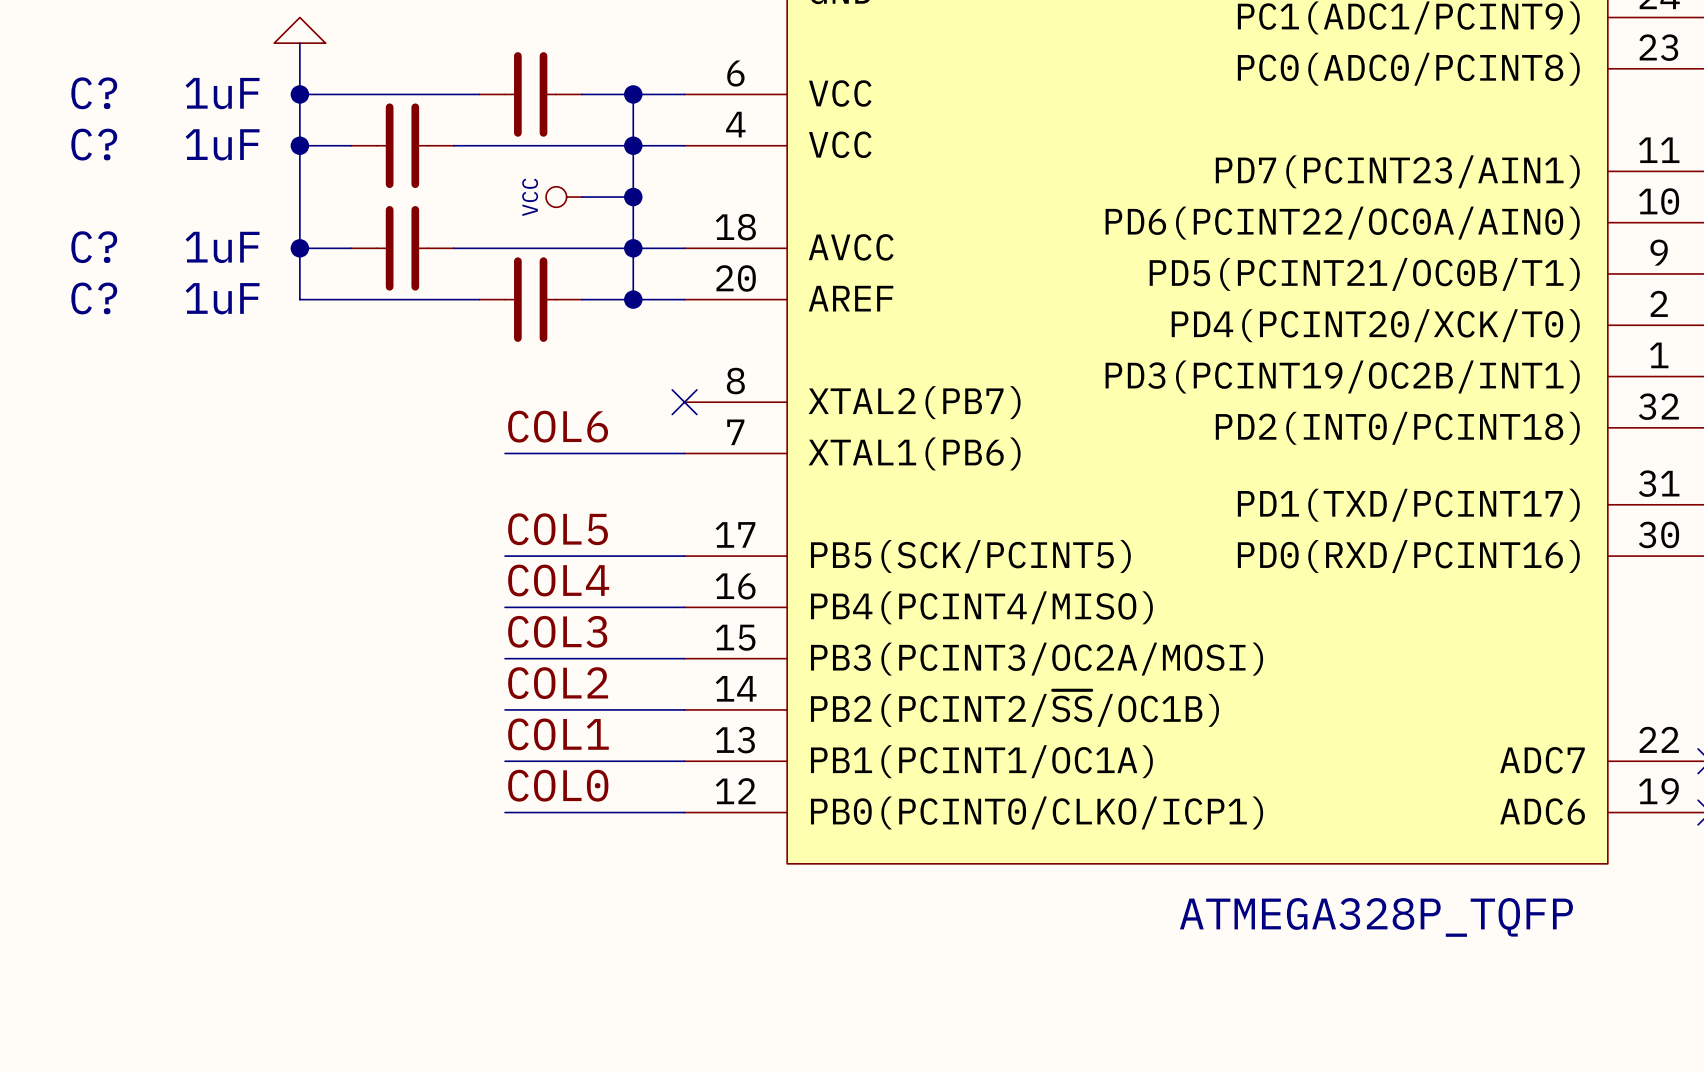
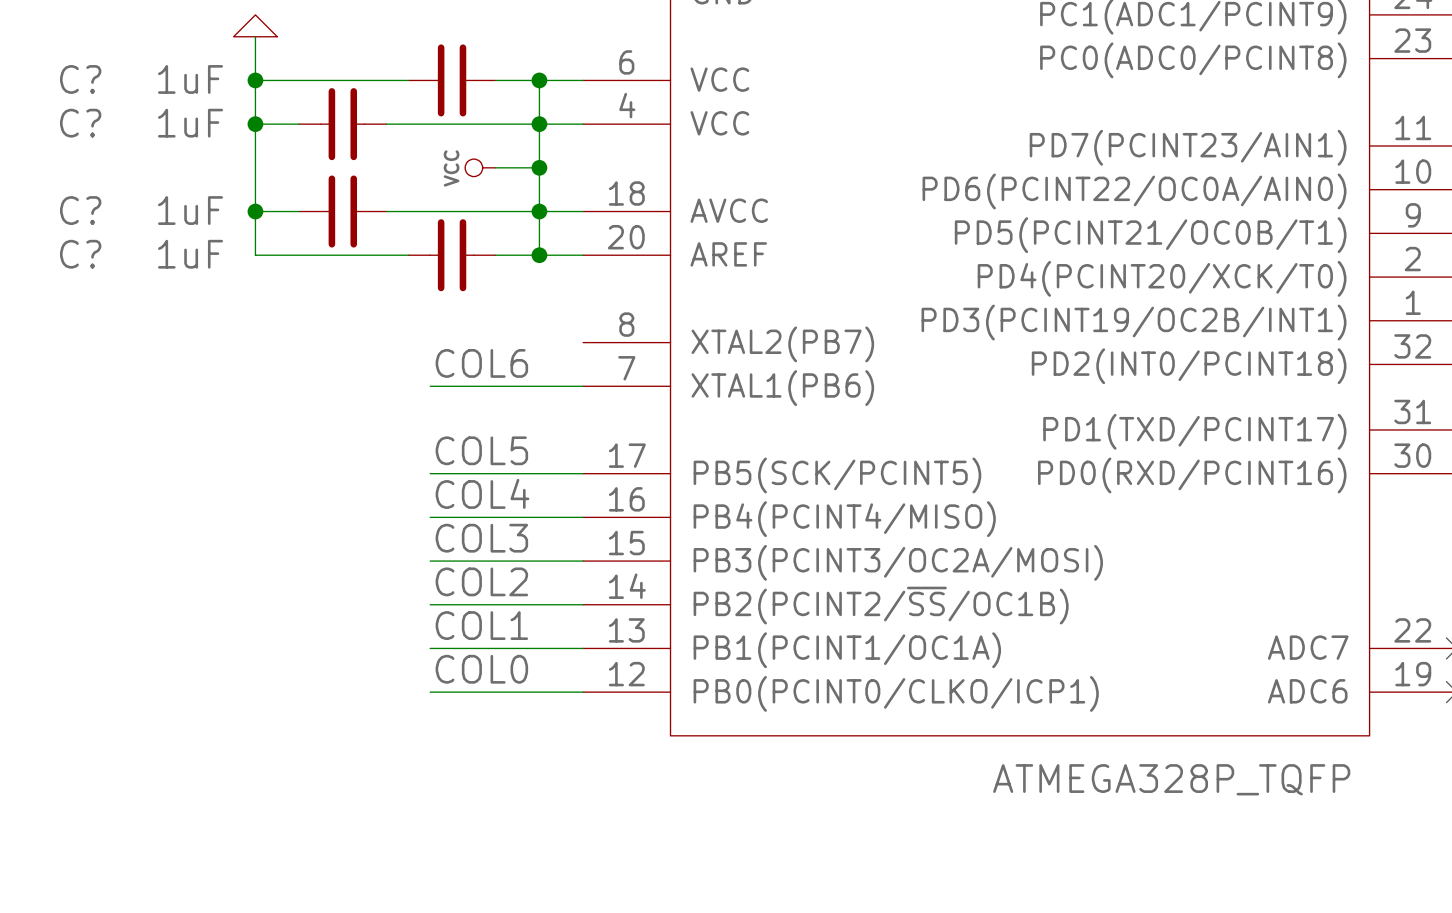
no-connect mark: (684, 402) -> none

